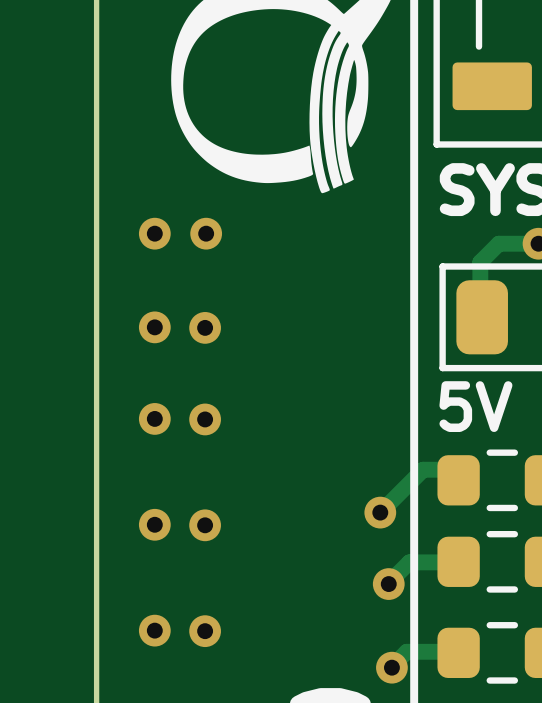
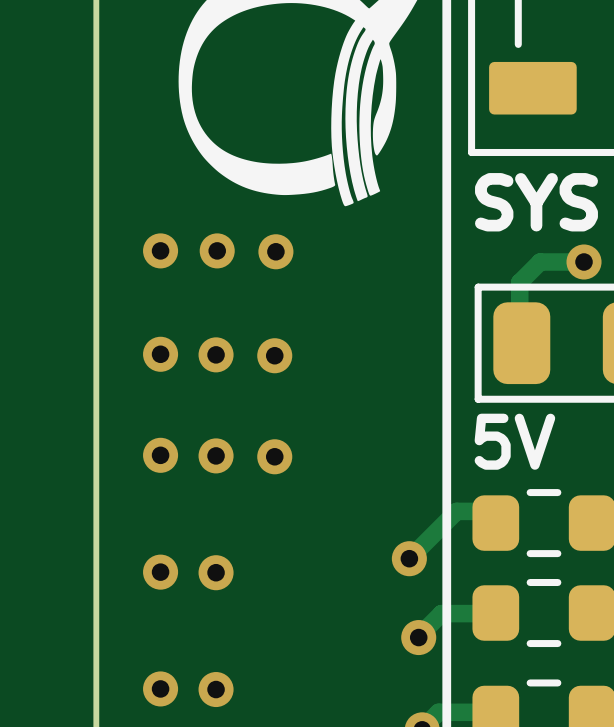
via: none -> (275, 251)
via: none -> (274, 355)
via: none -> (274, 456)

